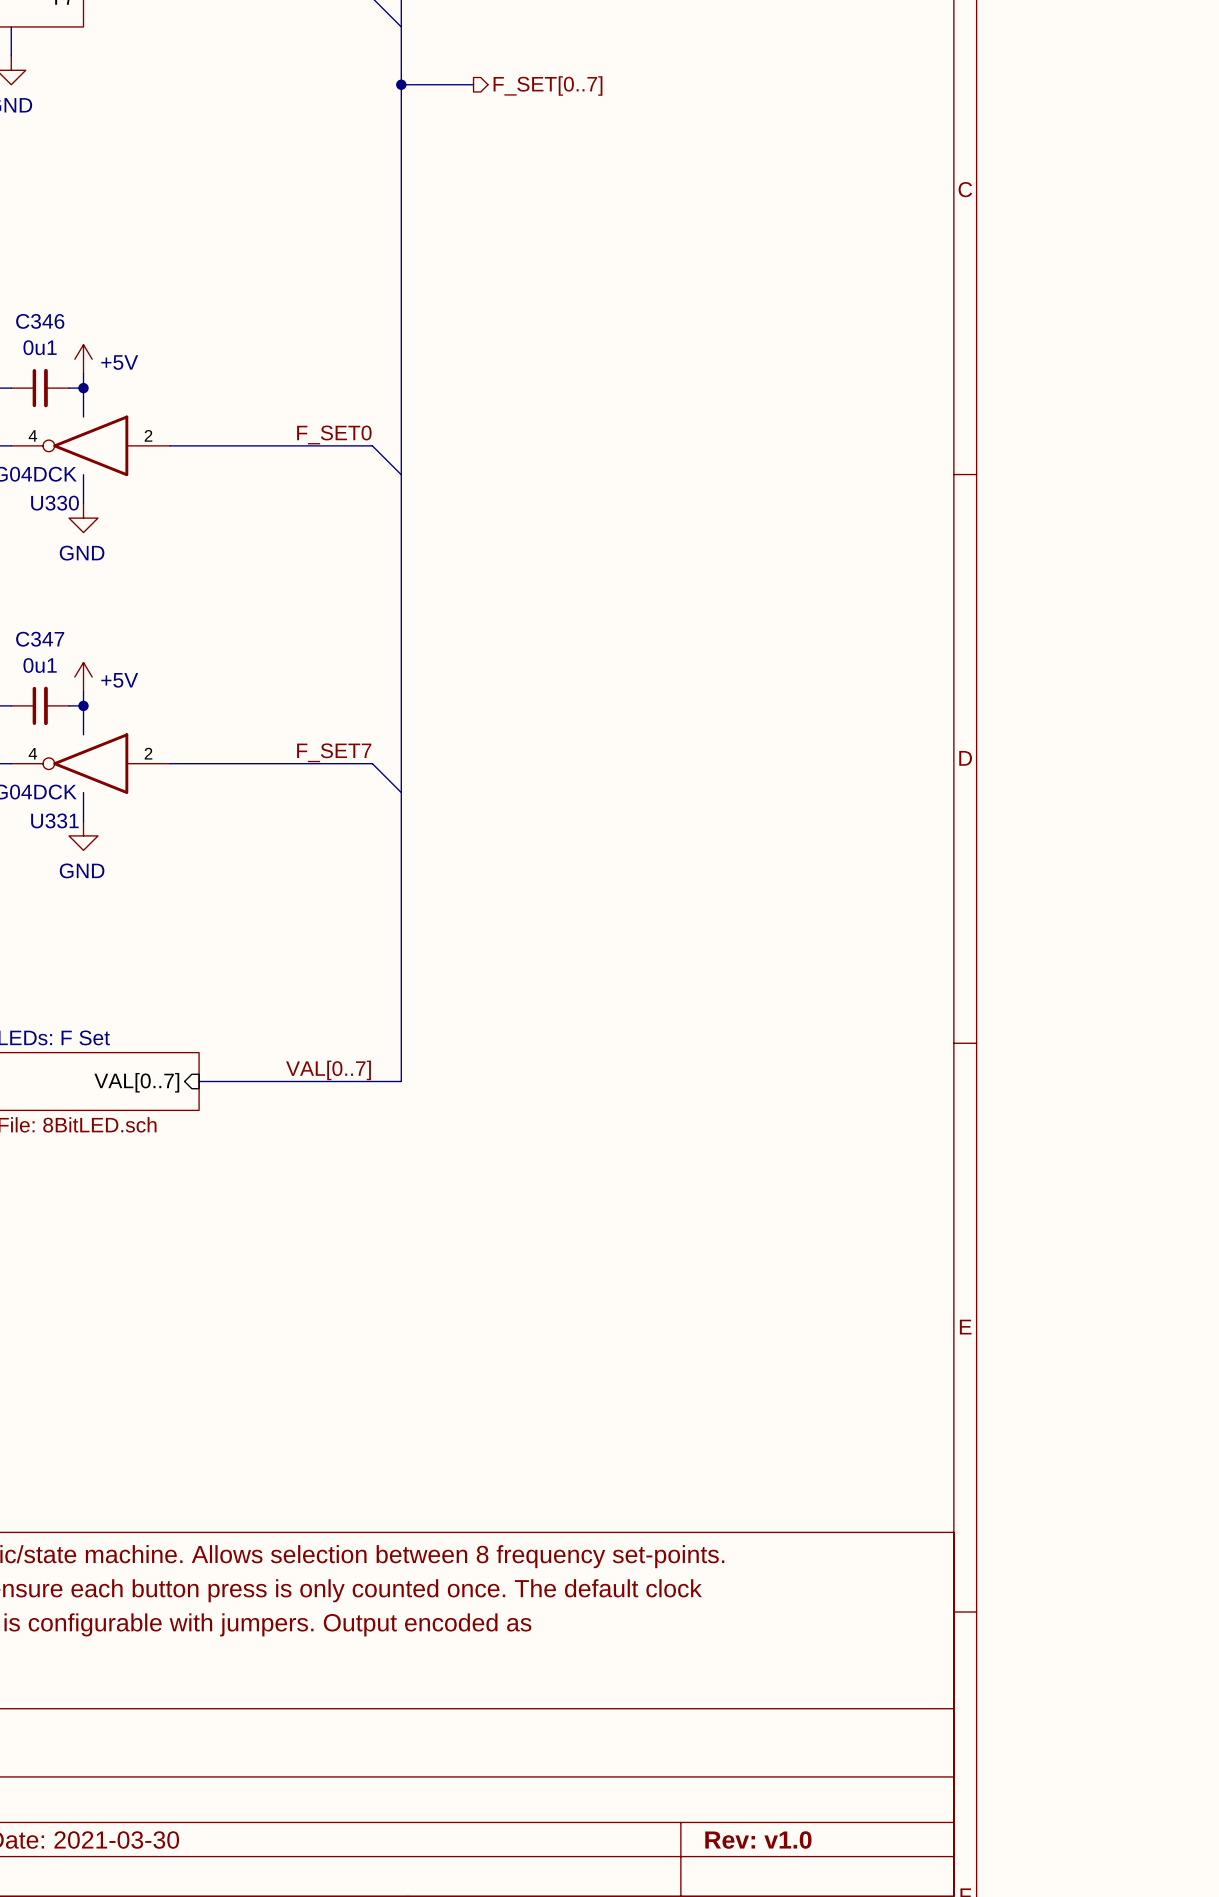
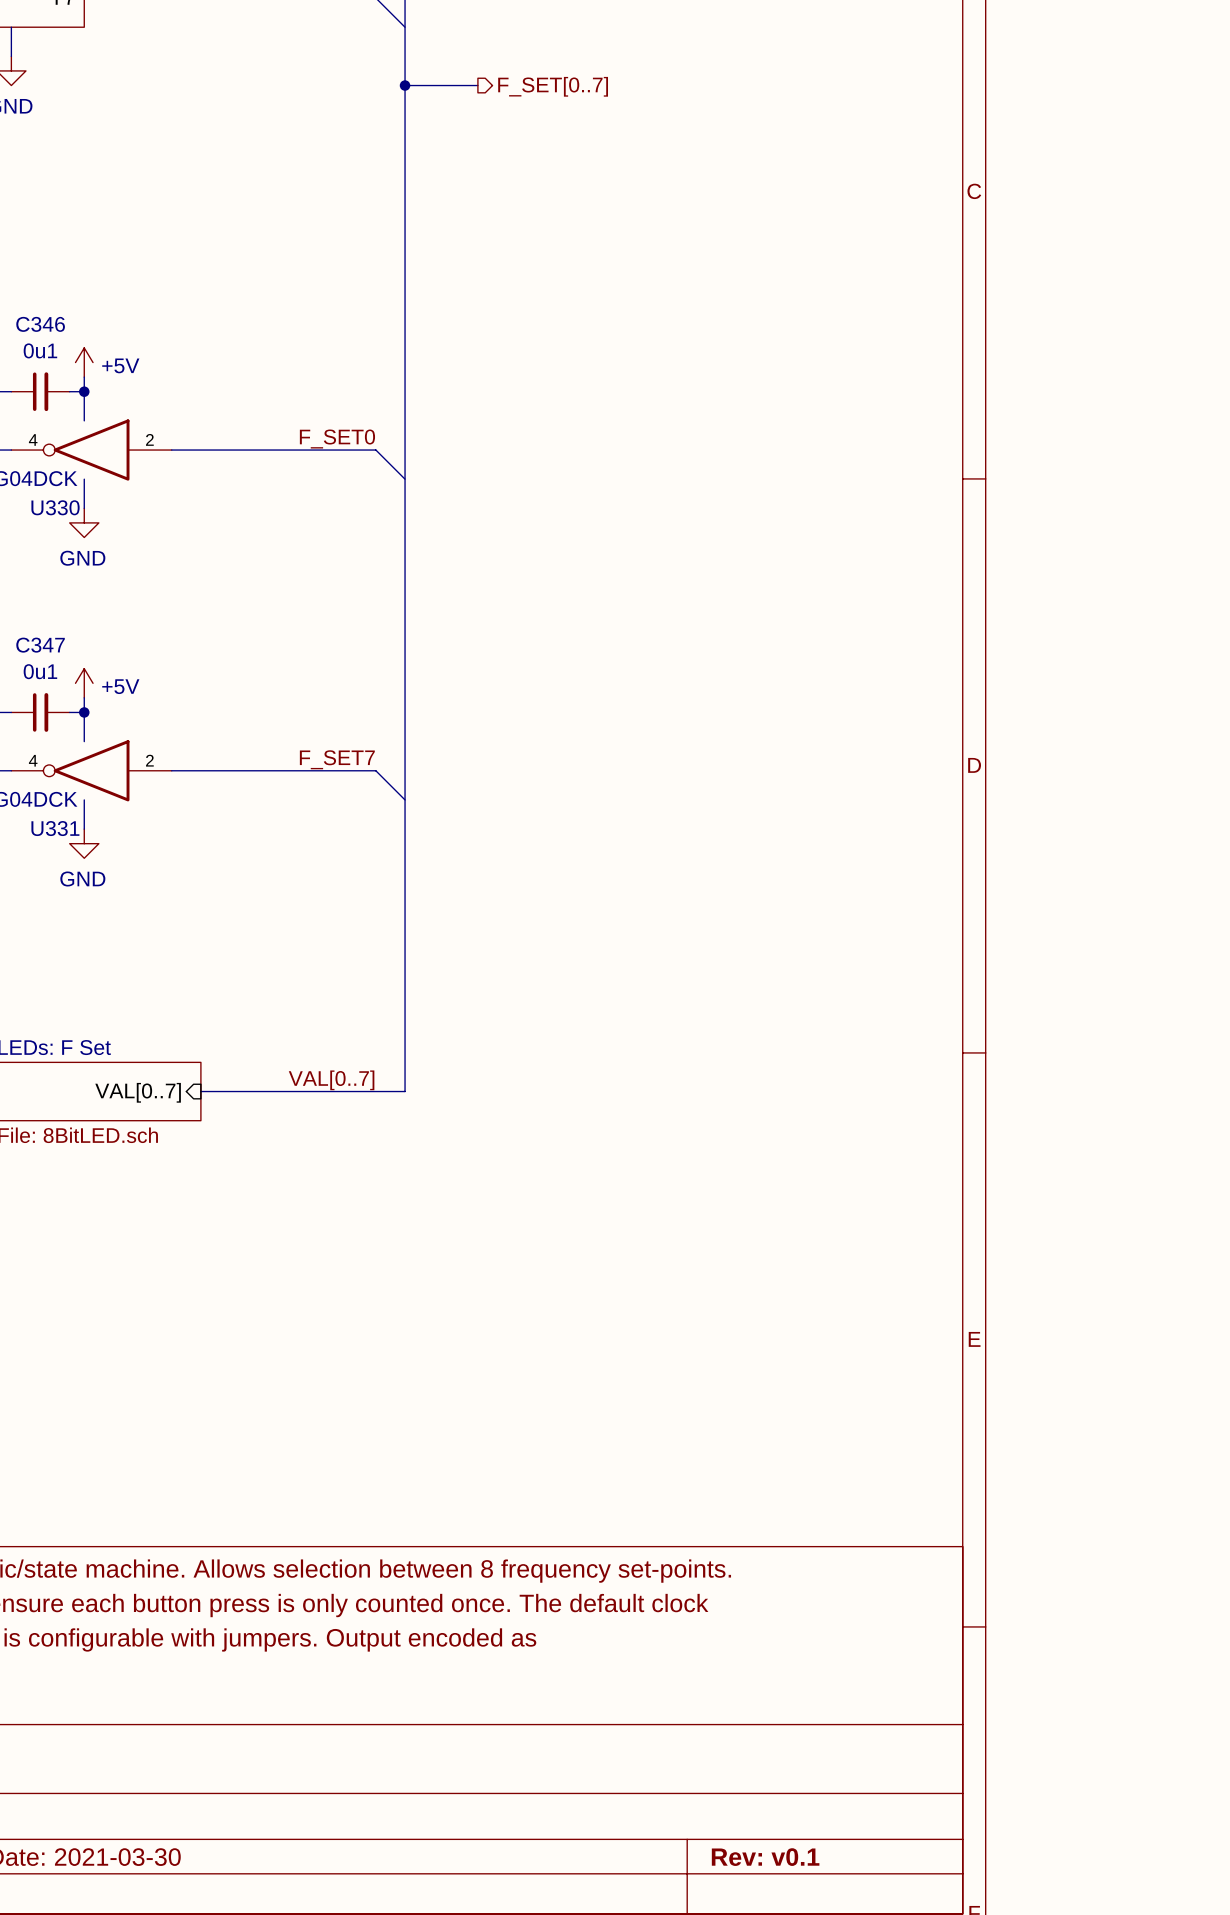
title block: Rev: v1.0 (758, 1840) -> Rev: v0.1 (765, 1857)

